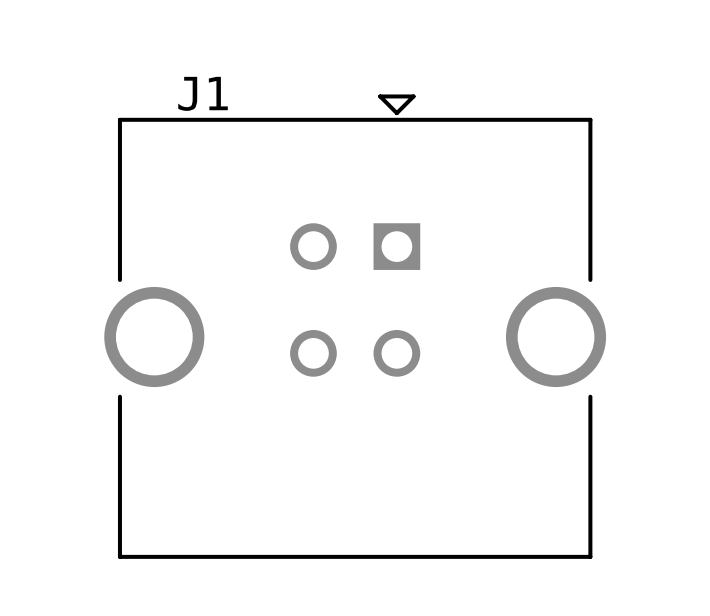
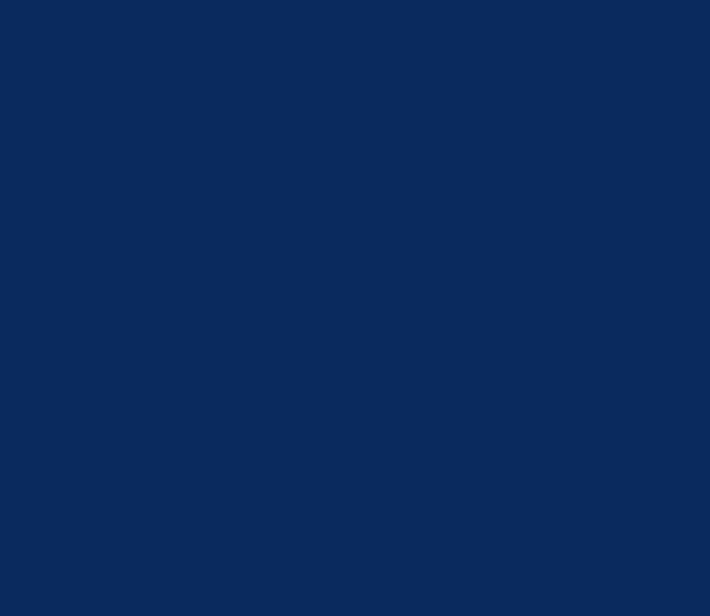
J1: (355, 326) -> none

